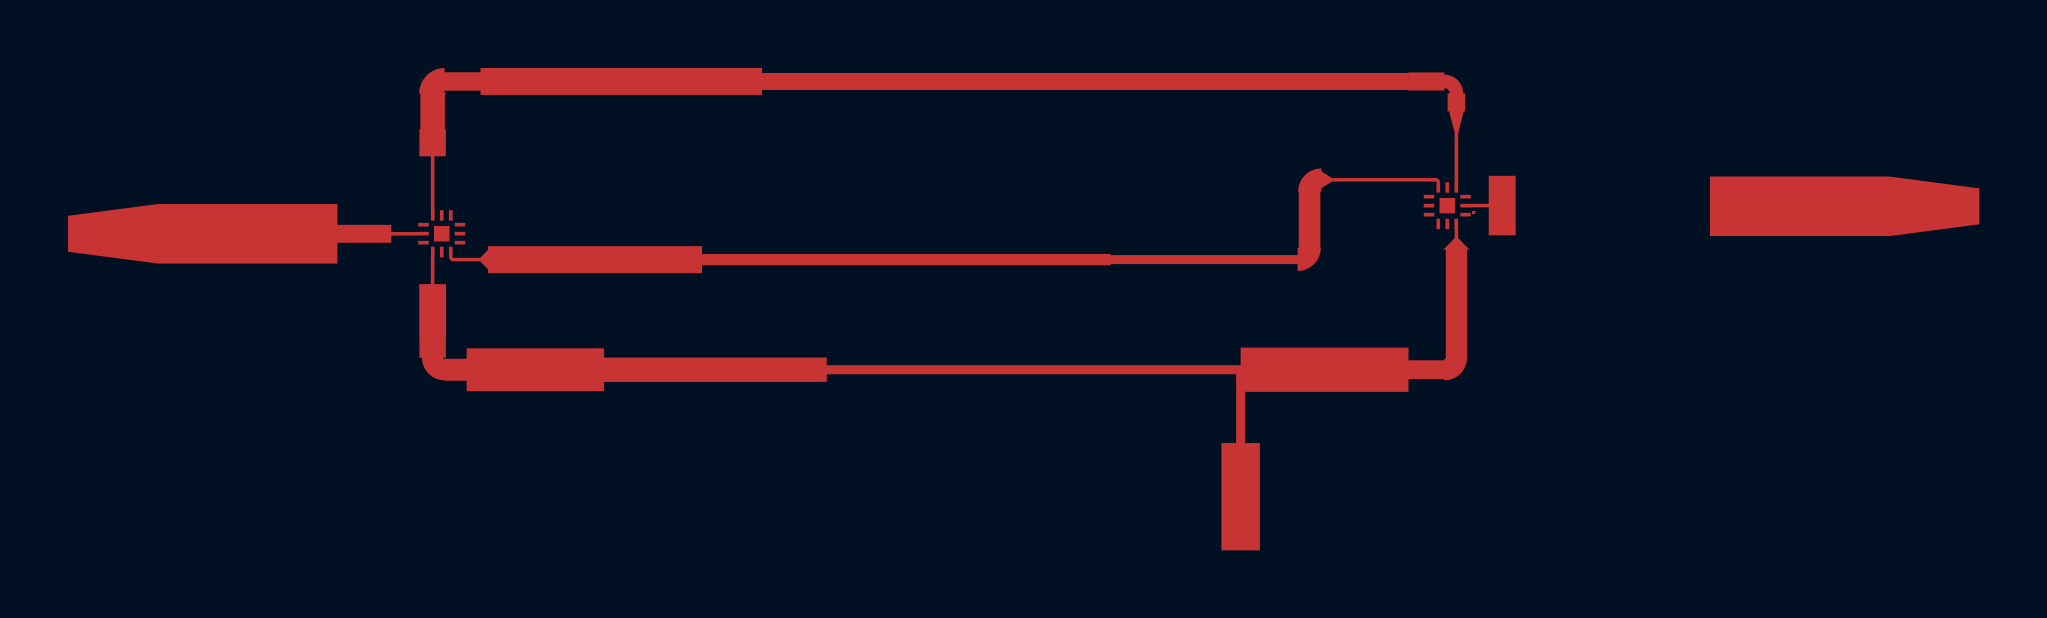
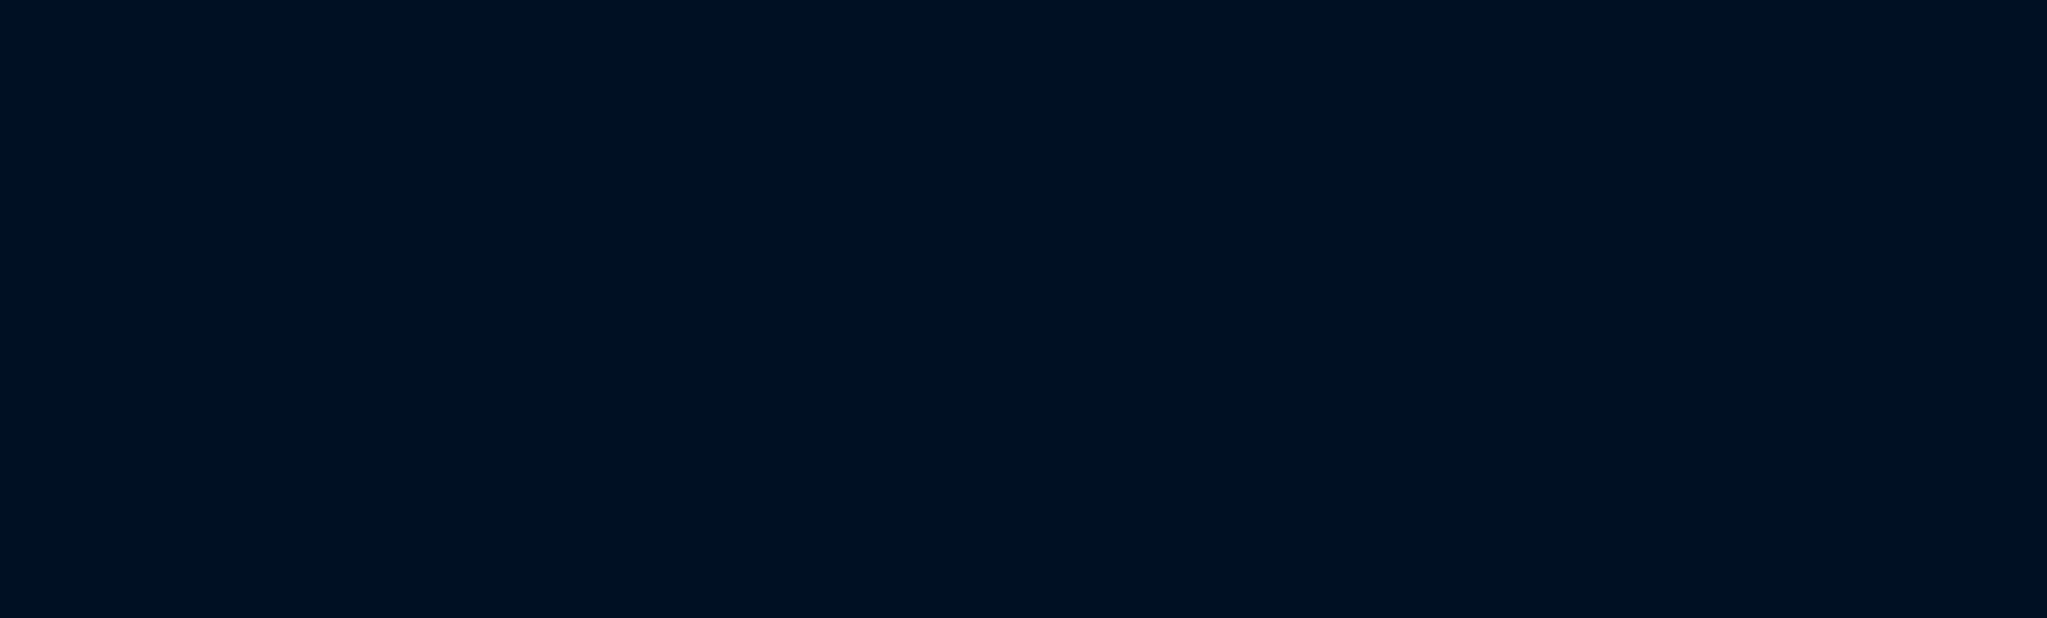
drawing: [67, 67, 1516, 551] -> none
drawing: [1709, 176, 1980, 237] -> none
track: (1472, 211) (1472, 213) -> none

